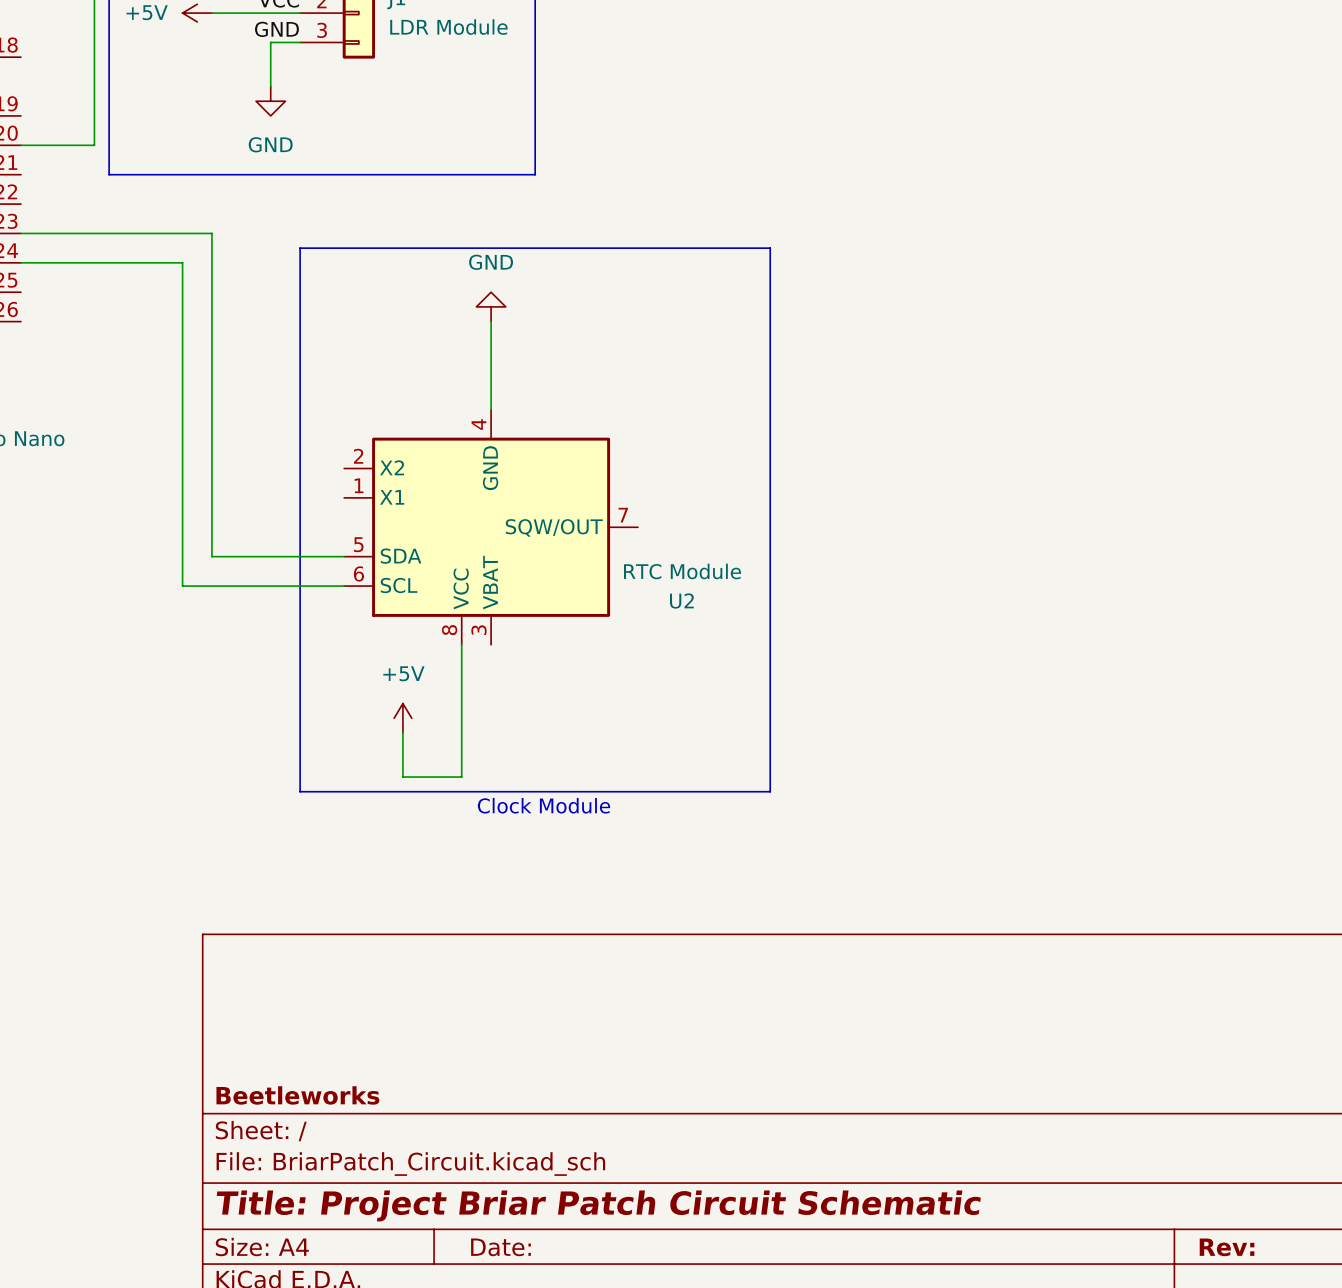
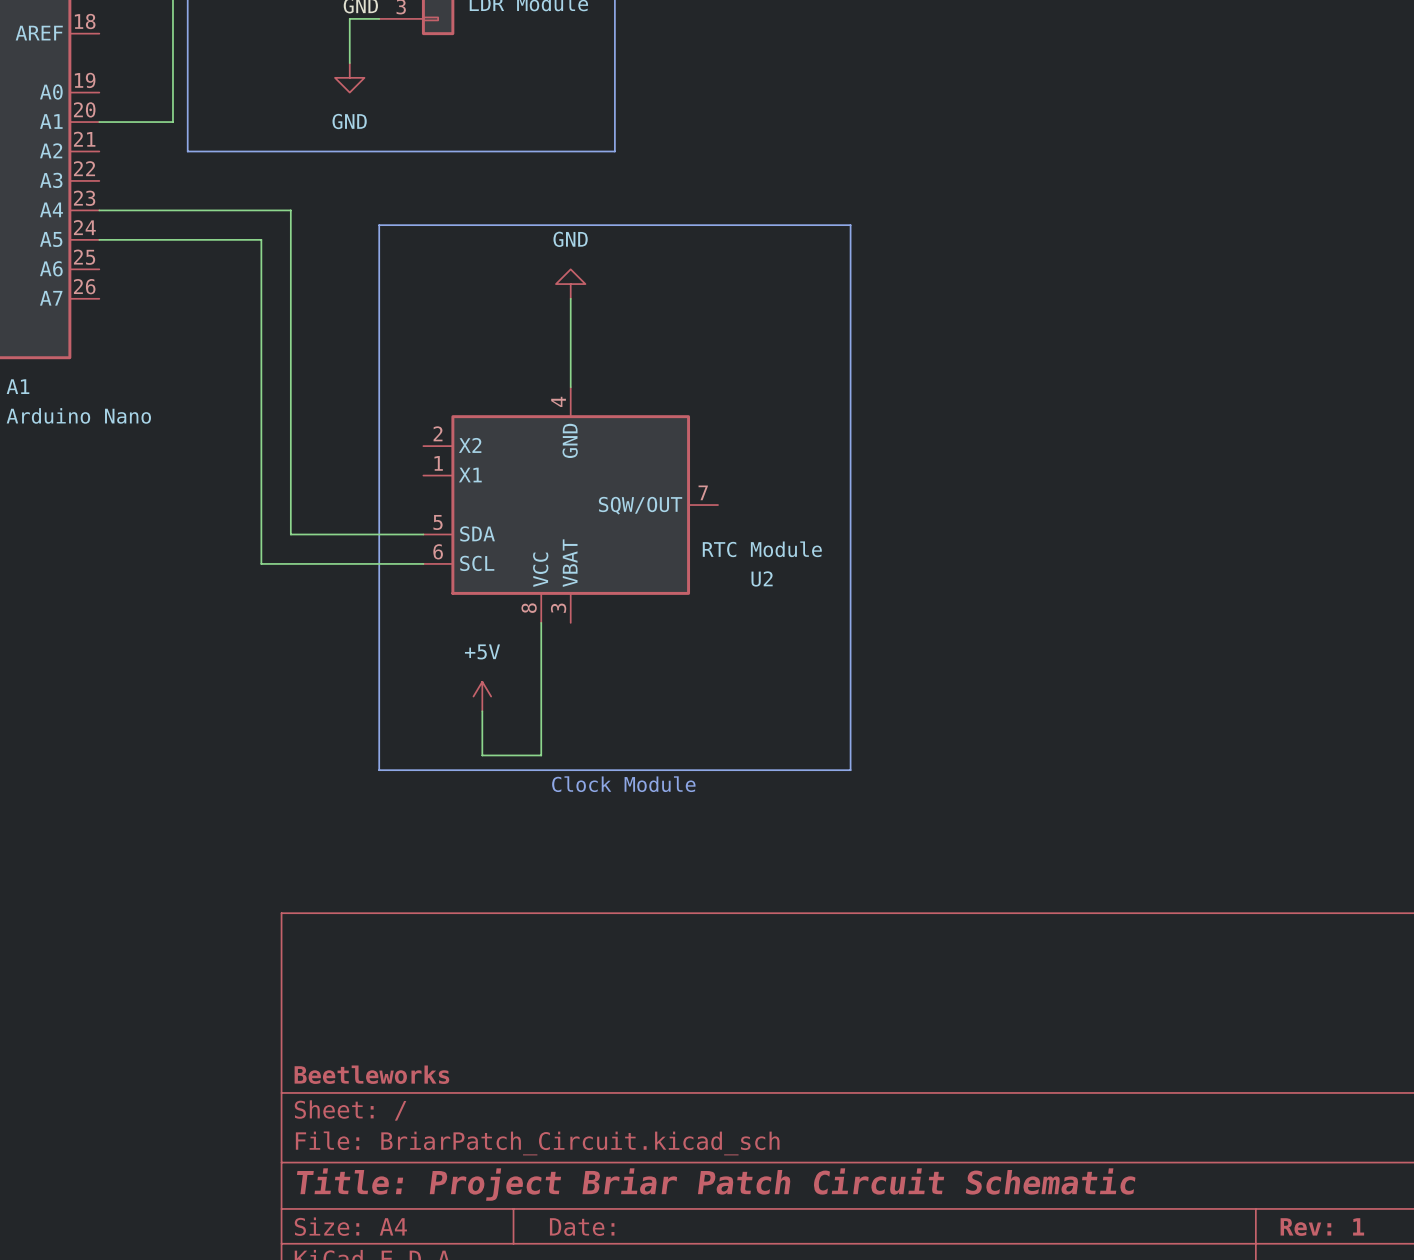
title block: Rev: (1227, 1247) -> Rev: 1 (1322, 1227)

